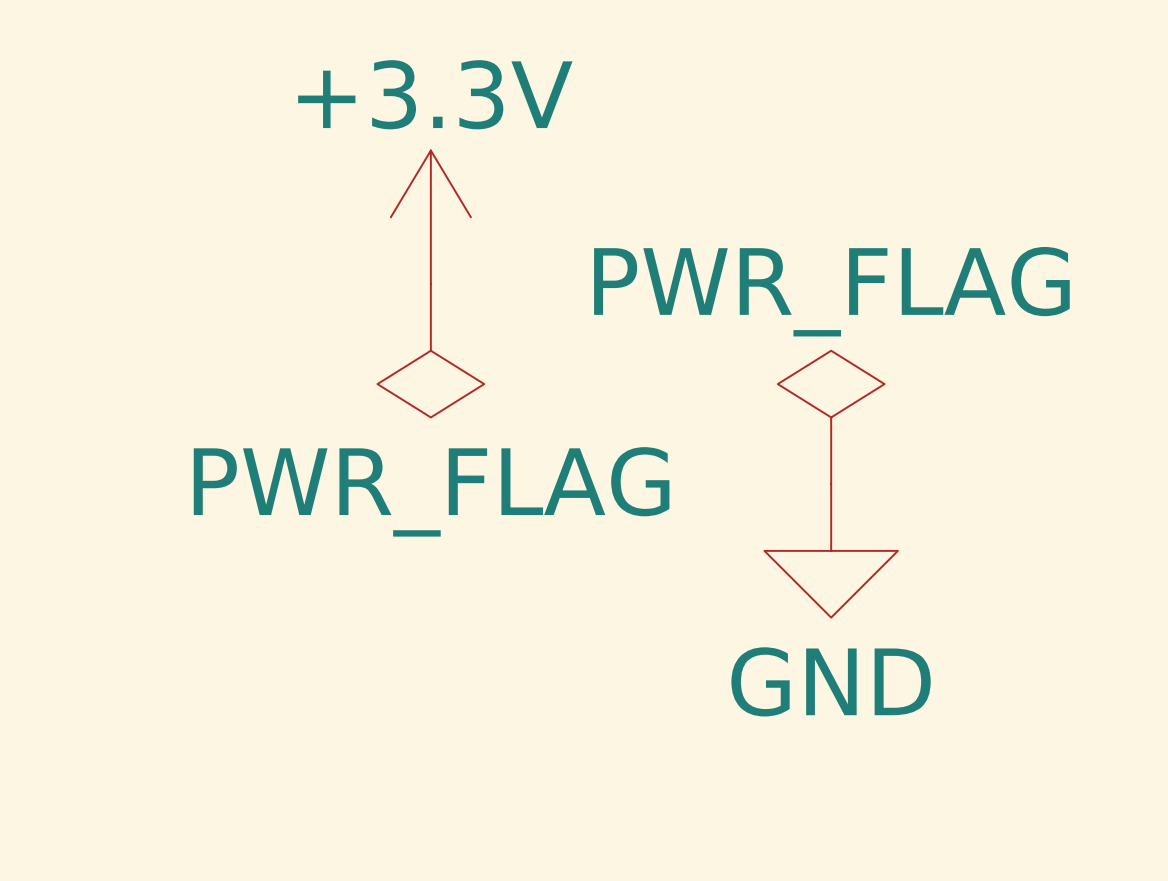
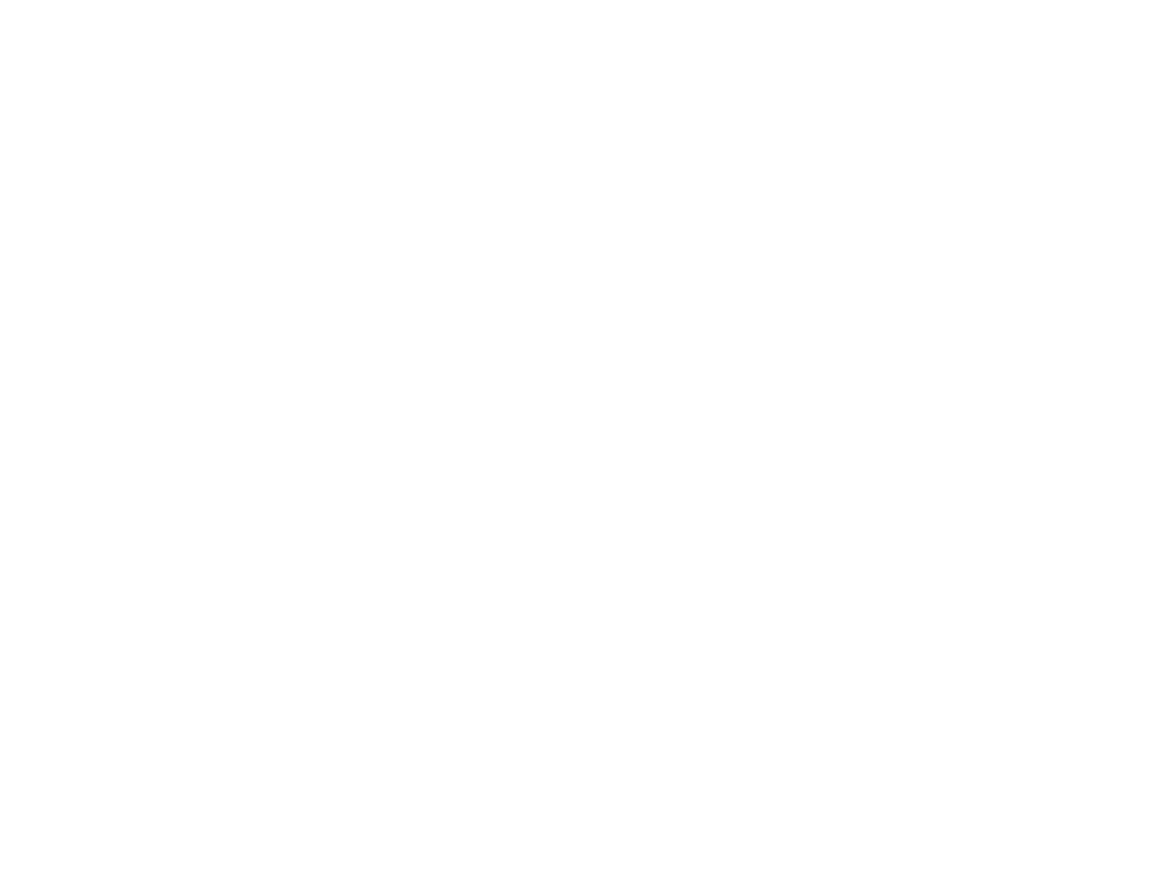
power symbol: +3.3V (430, 217) -> none
power symbol: PWR_FLAG (430, 350) -> none
power symbol: PWR_FLAG (831, 417) -> none
power symbol: GND (831, 550) -> none

